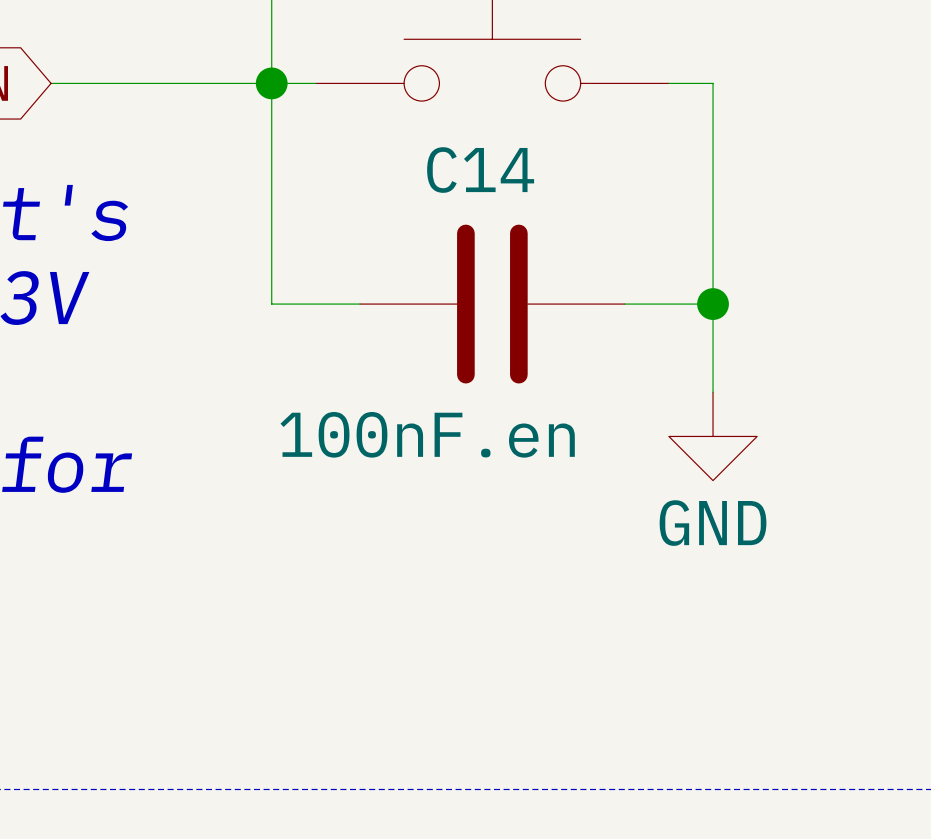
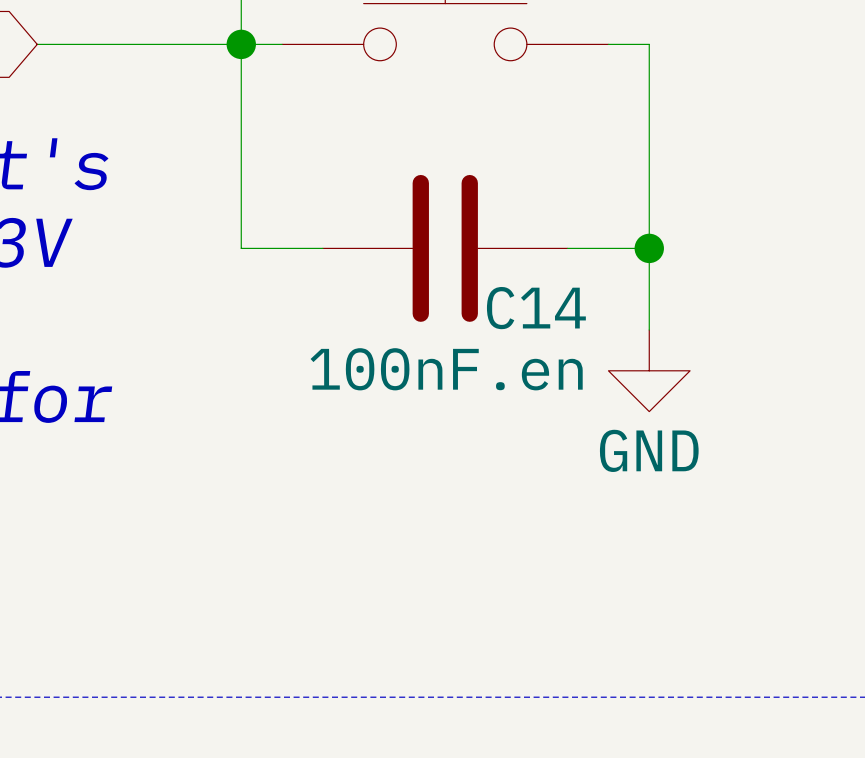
C14 name position: C14 (480, 170) -> C14 (536, 308)
C14 value position: 100nF.en (427, 434) -> 100nF.en (446, 369)

